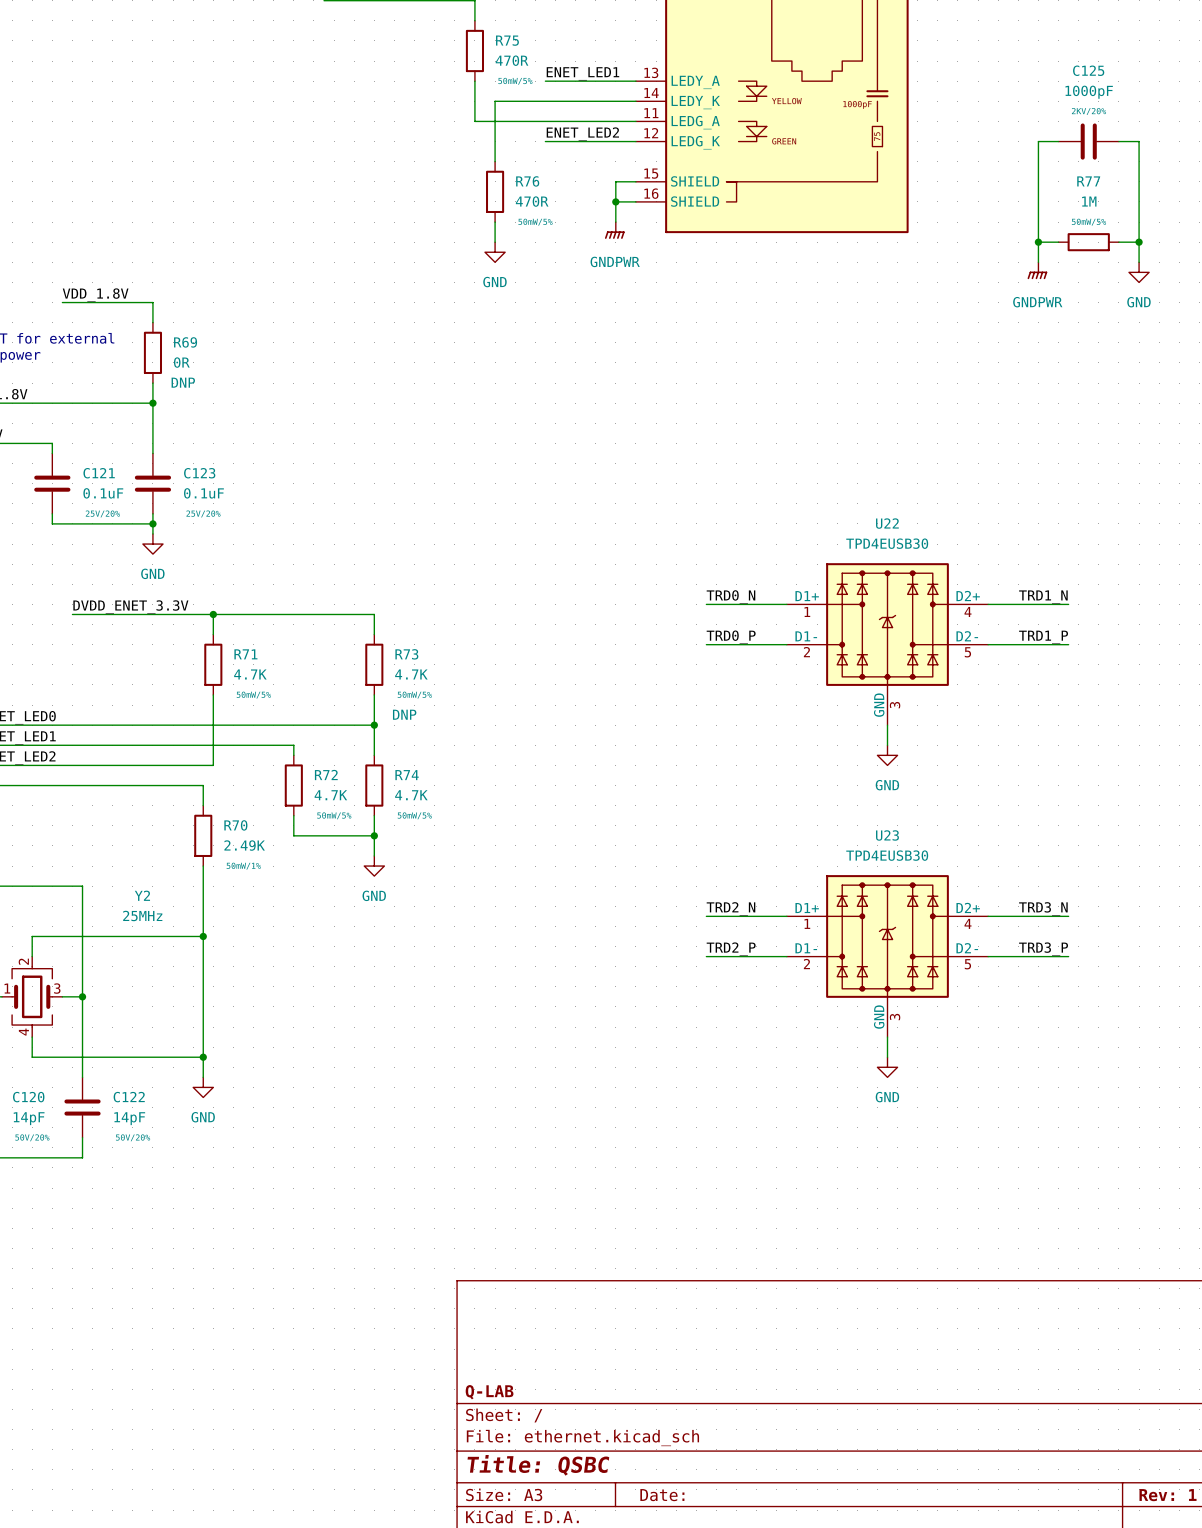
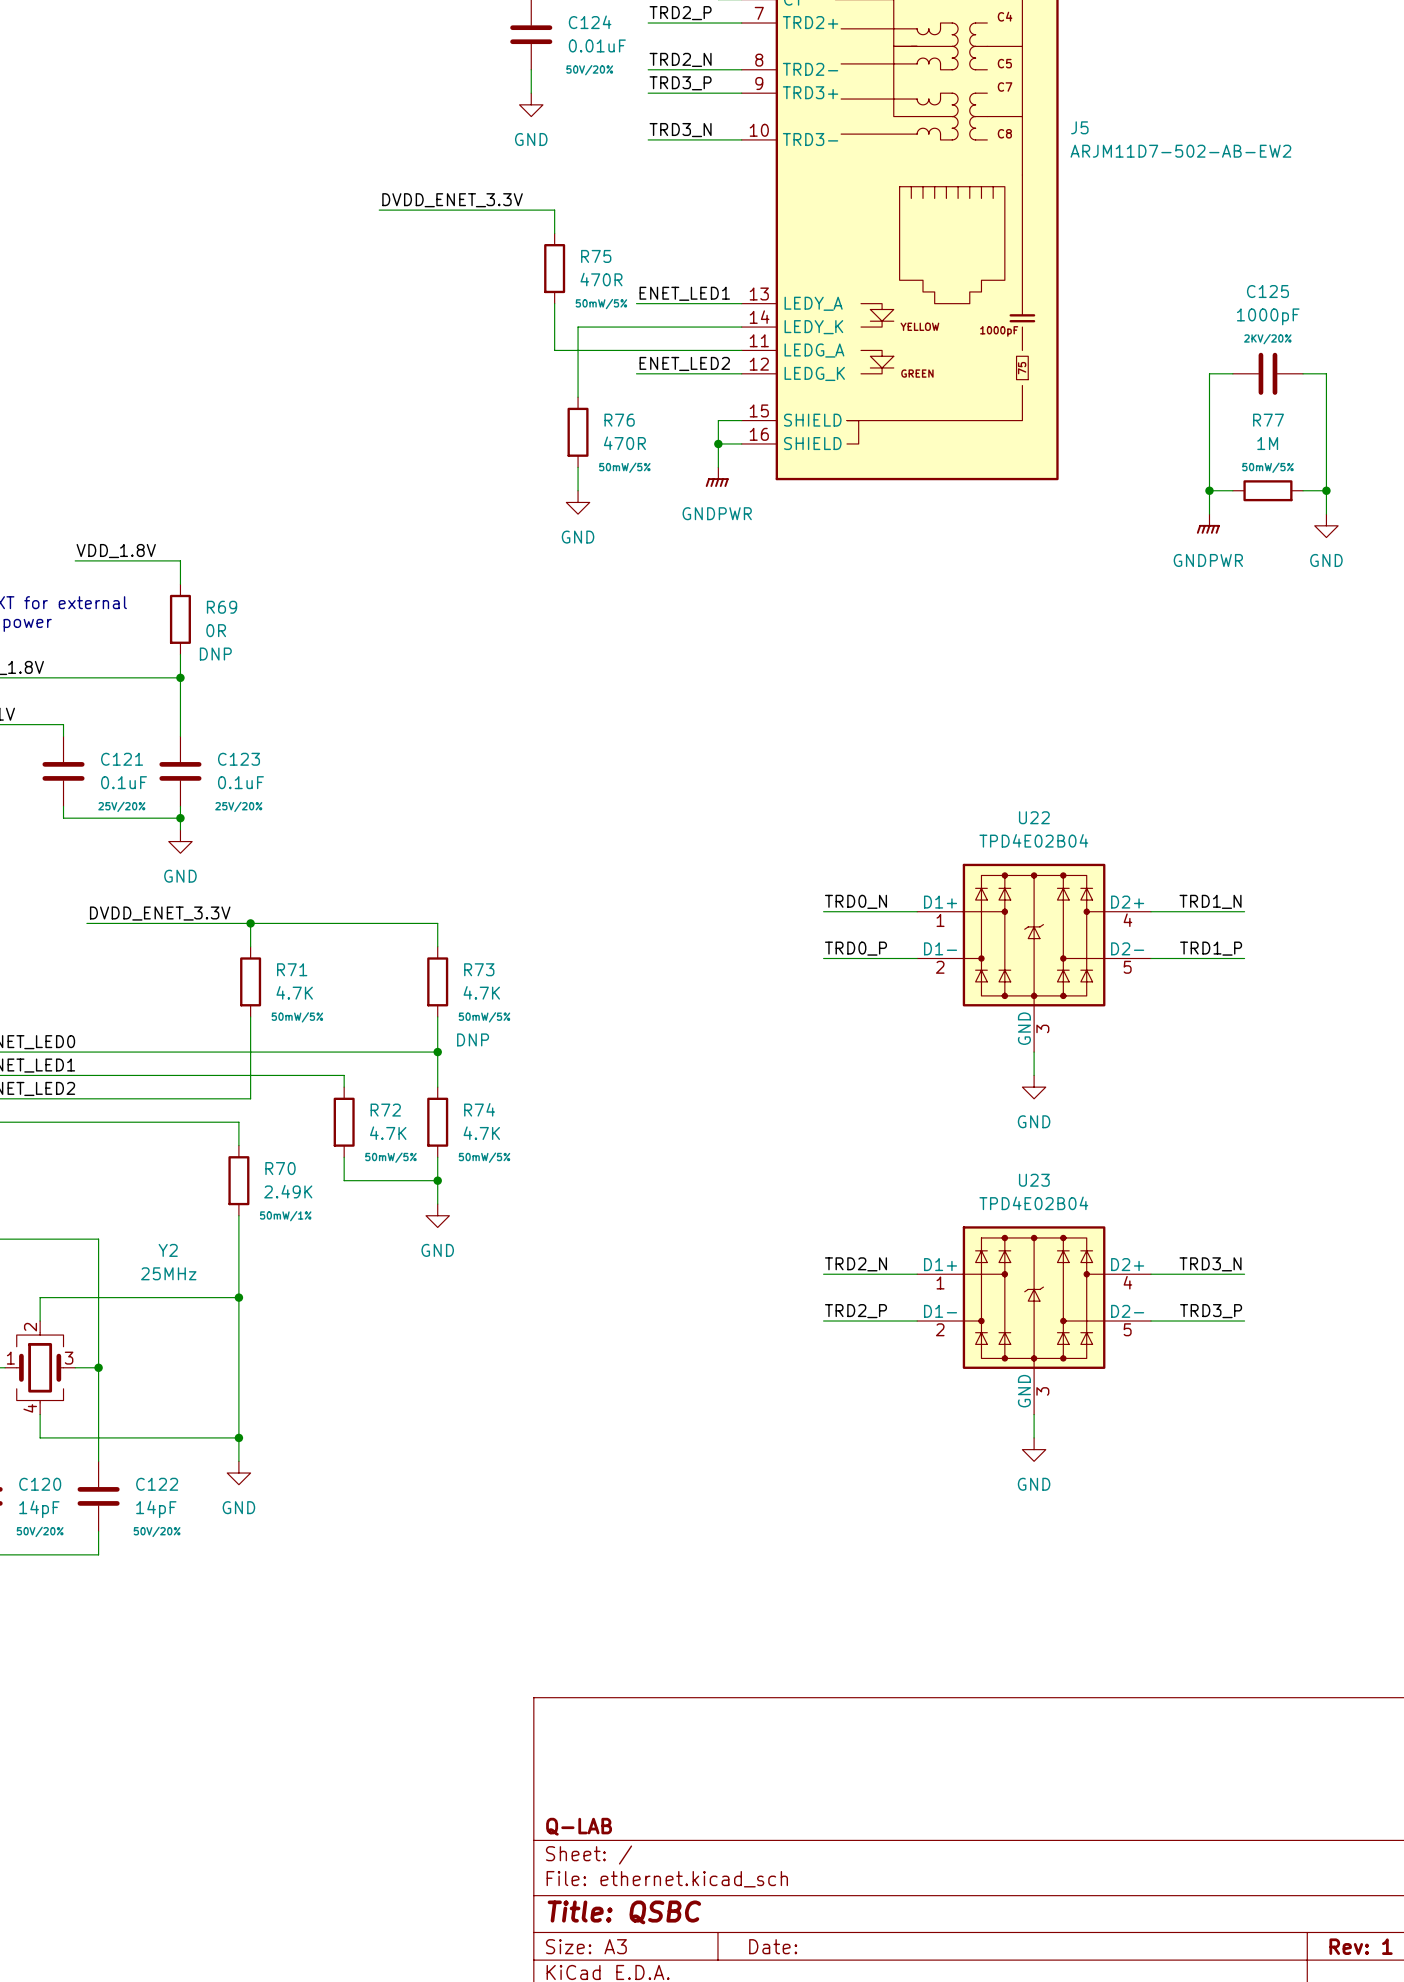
U22 value: TPD4EUSB30 (887, 543) -> TPD4E02B04 (1033, 840)
U23 value: TPD4EUSB30 (887, 855) -> TPD4E02B04 (1033, 1203)

